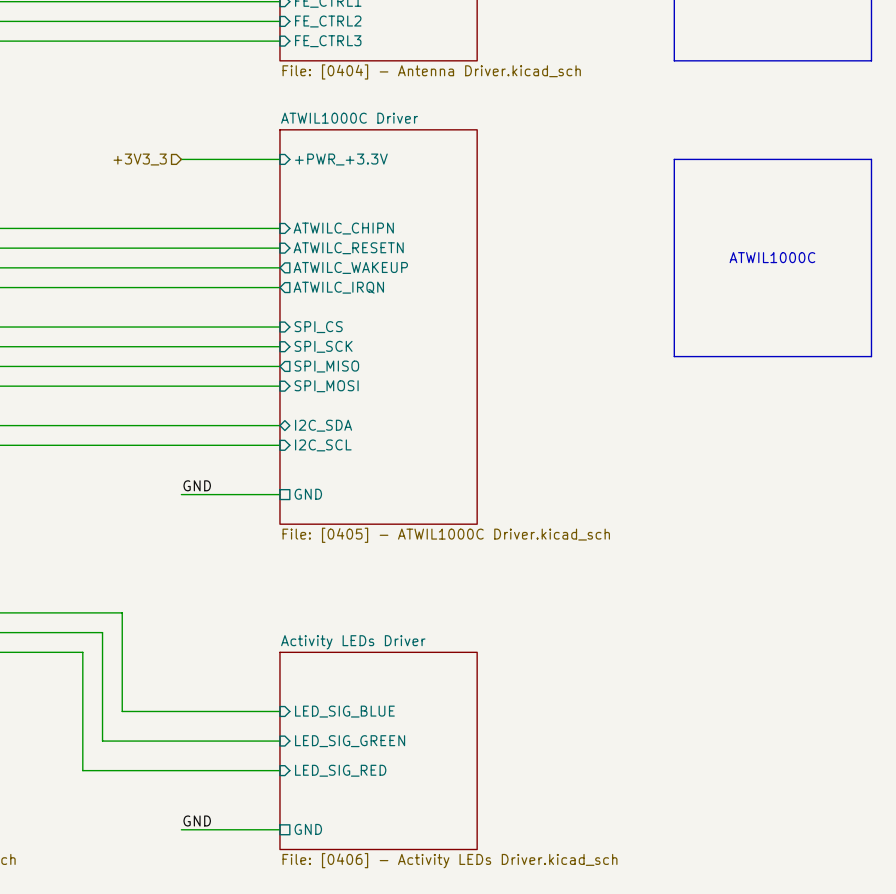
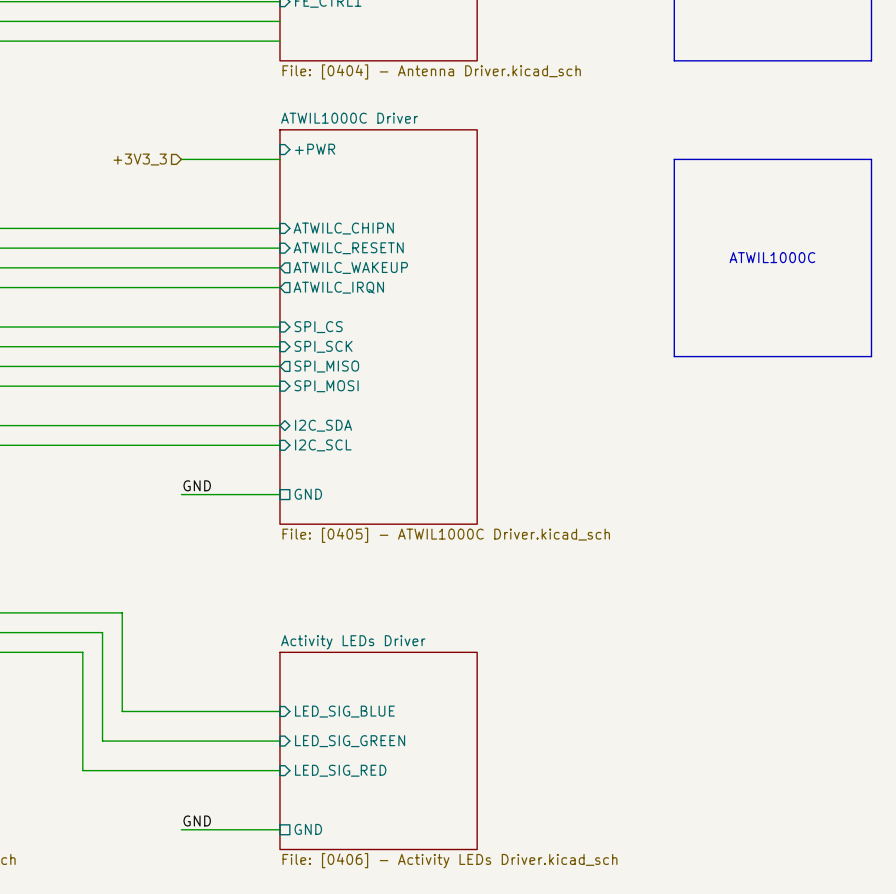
sheet pin: FE_CTRL2 (328, 21) -> none
sheet pin: FE_CTRL3 (328, 41) -> none
sheet pin: none -> +PWR (315, 149)
sheet pin: +PWR_+3.3V (341, 159) -> none

